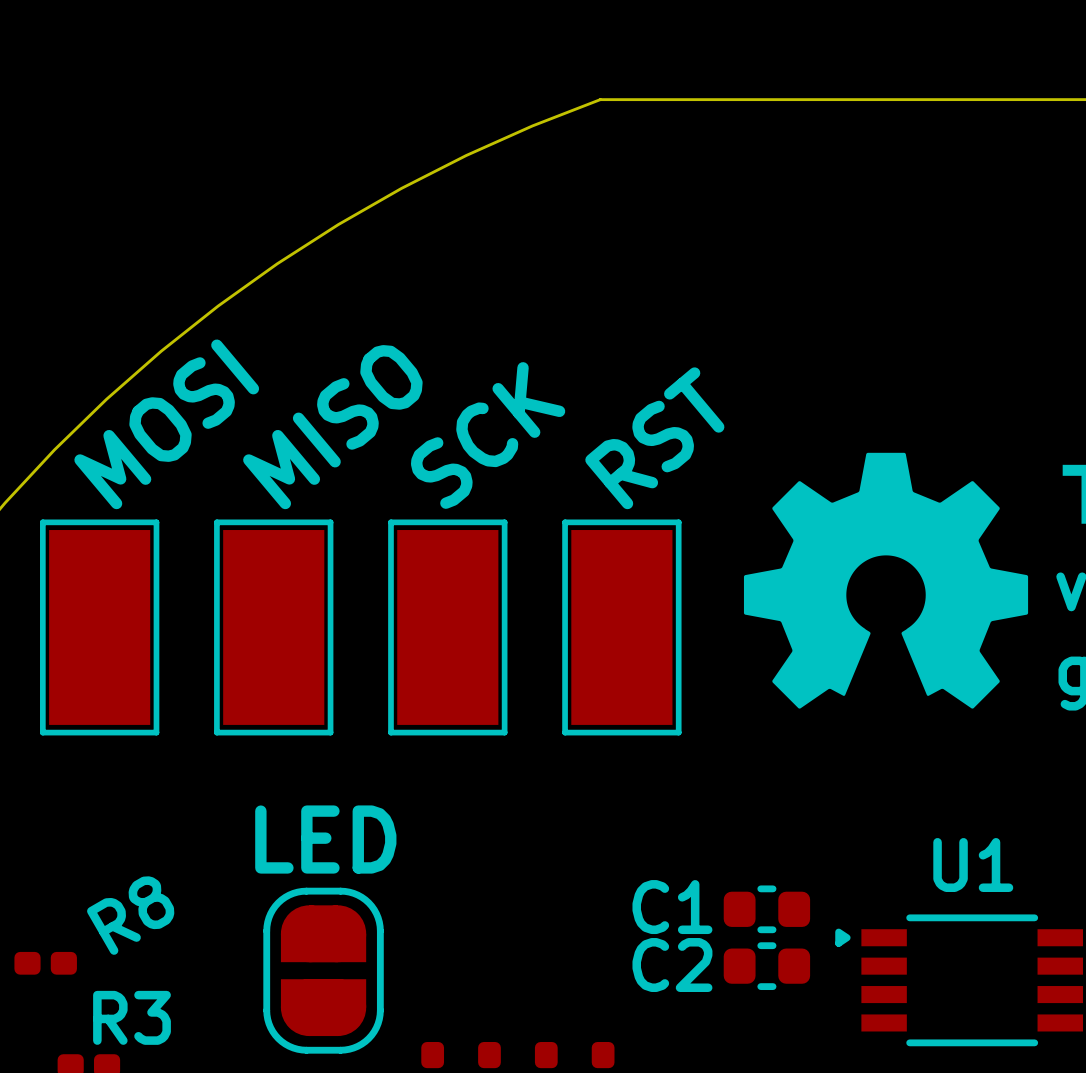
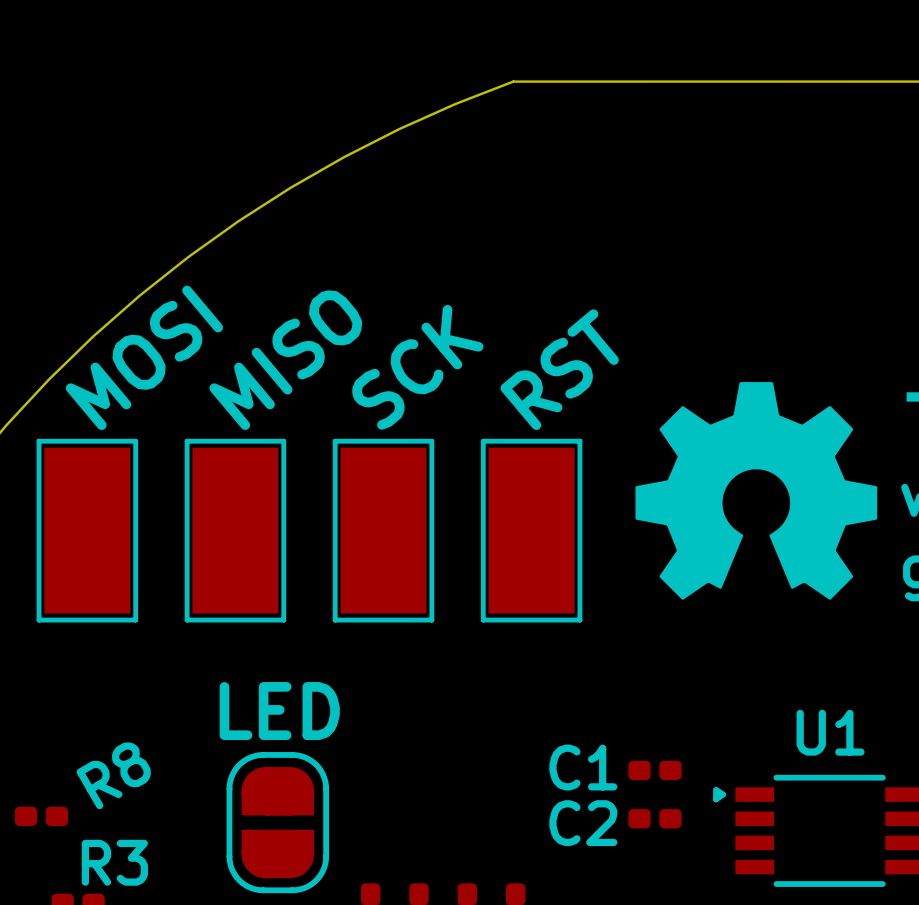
C1 footprint: [723, 885, 811, 934] -> [628, 760, 682, 781]
C2 footprint: [723, 942, 811, 991] -> [628, 809, 682, 829]

